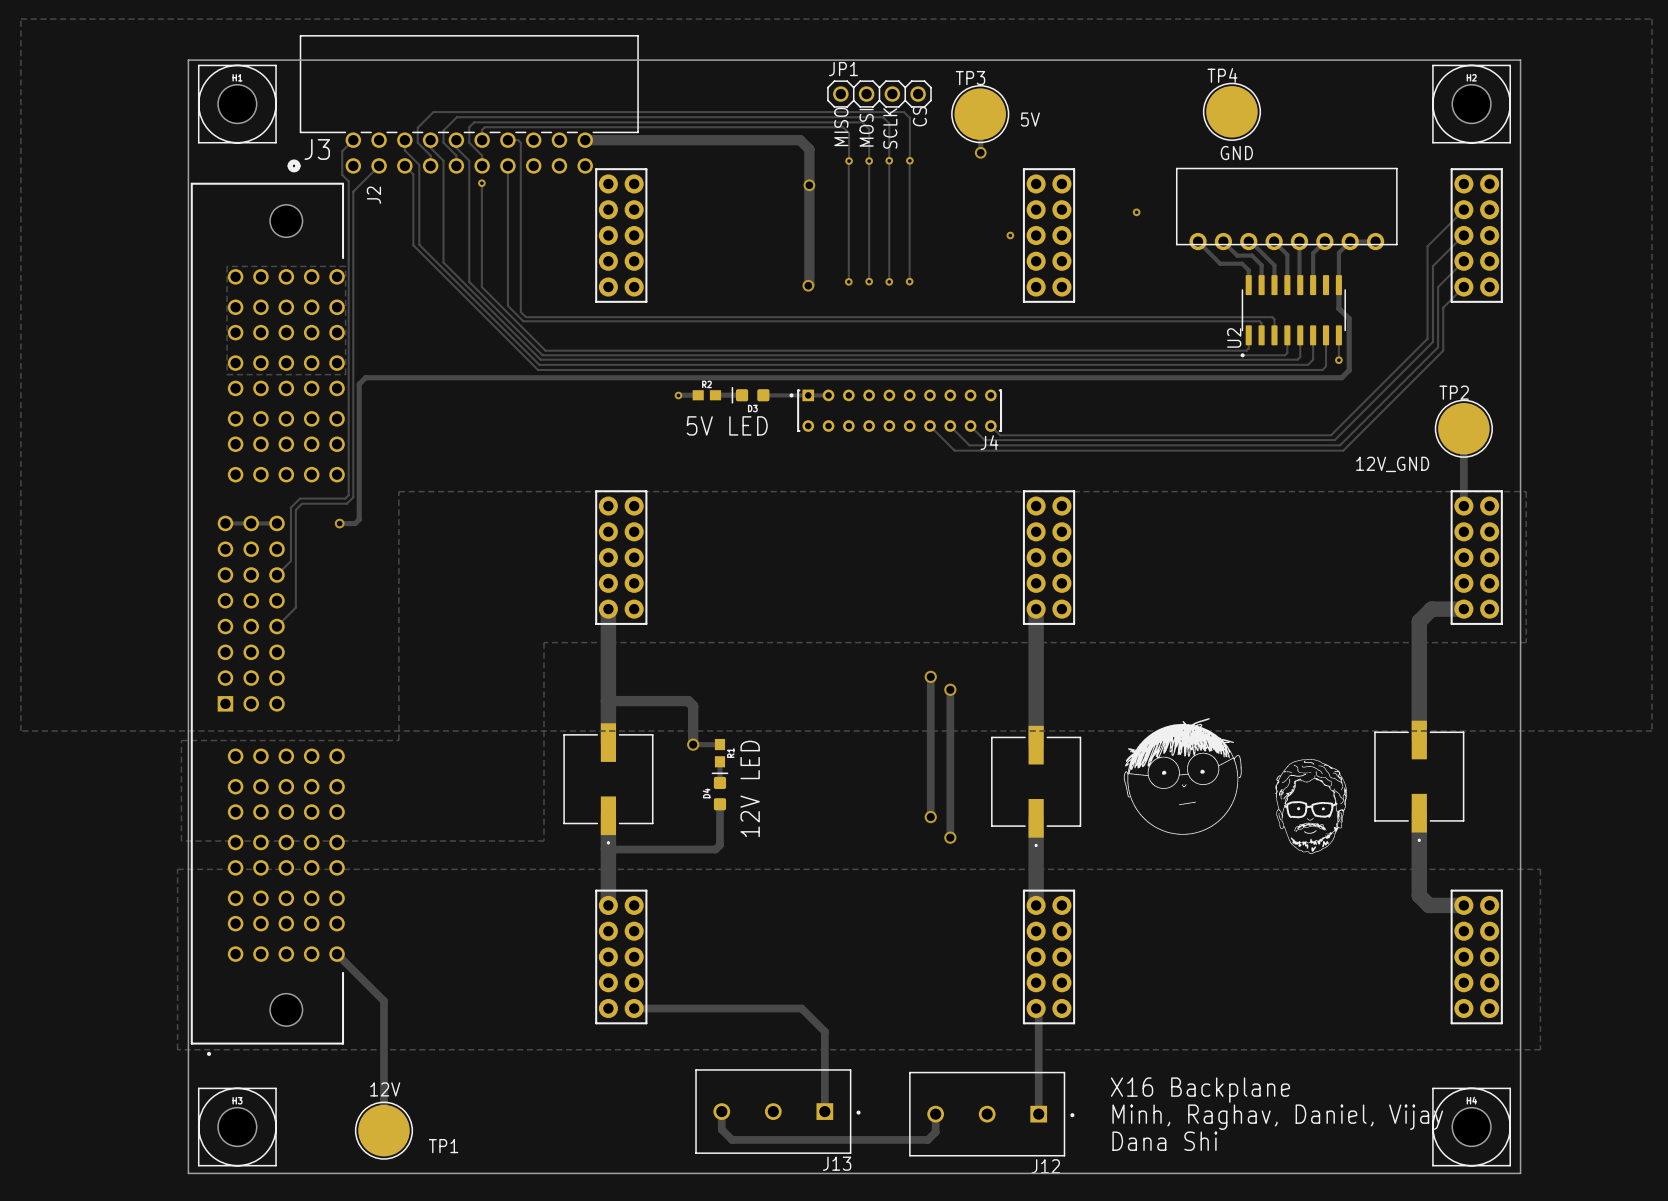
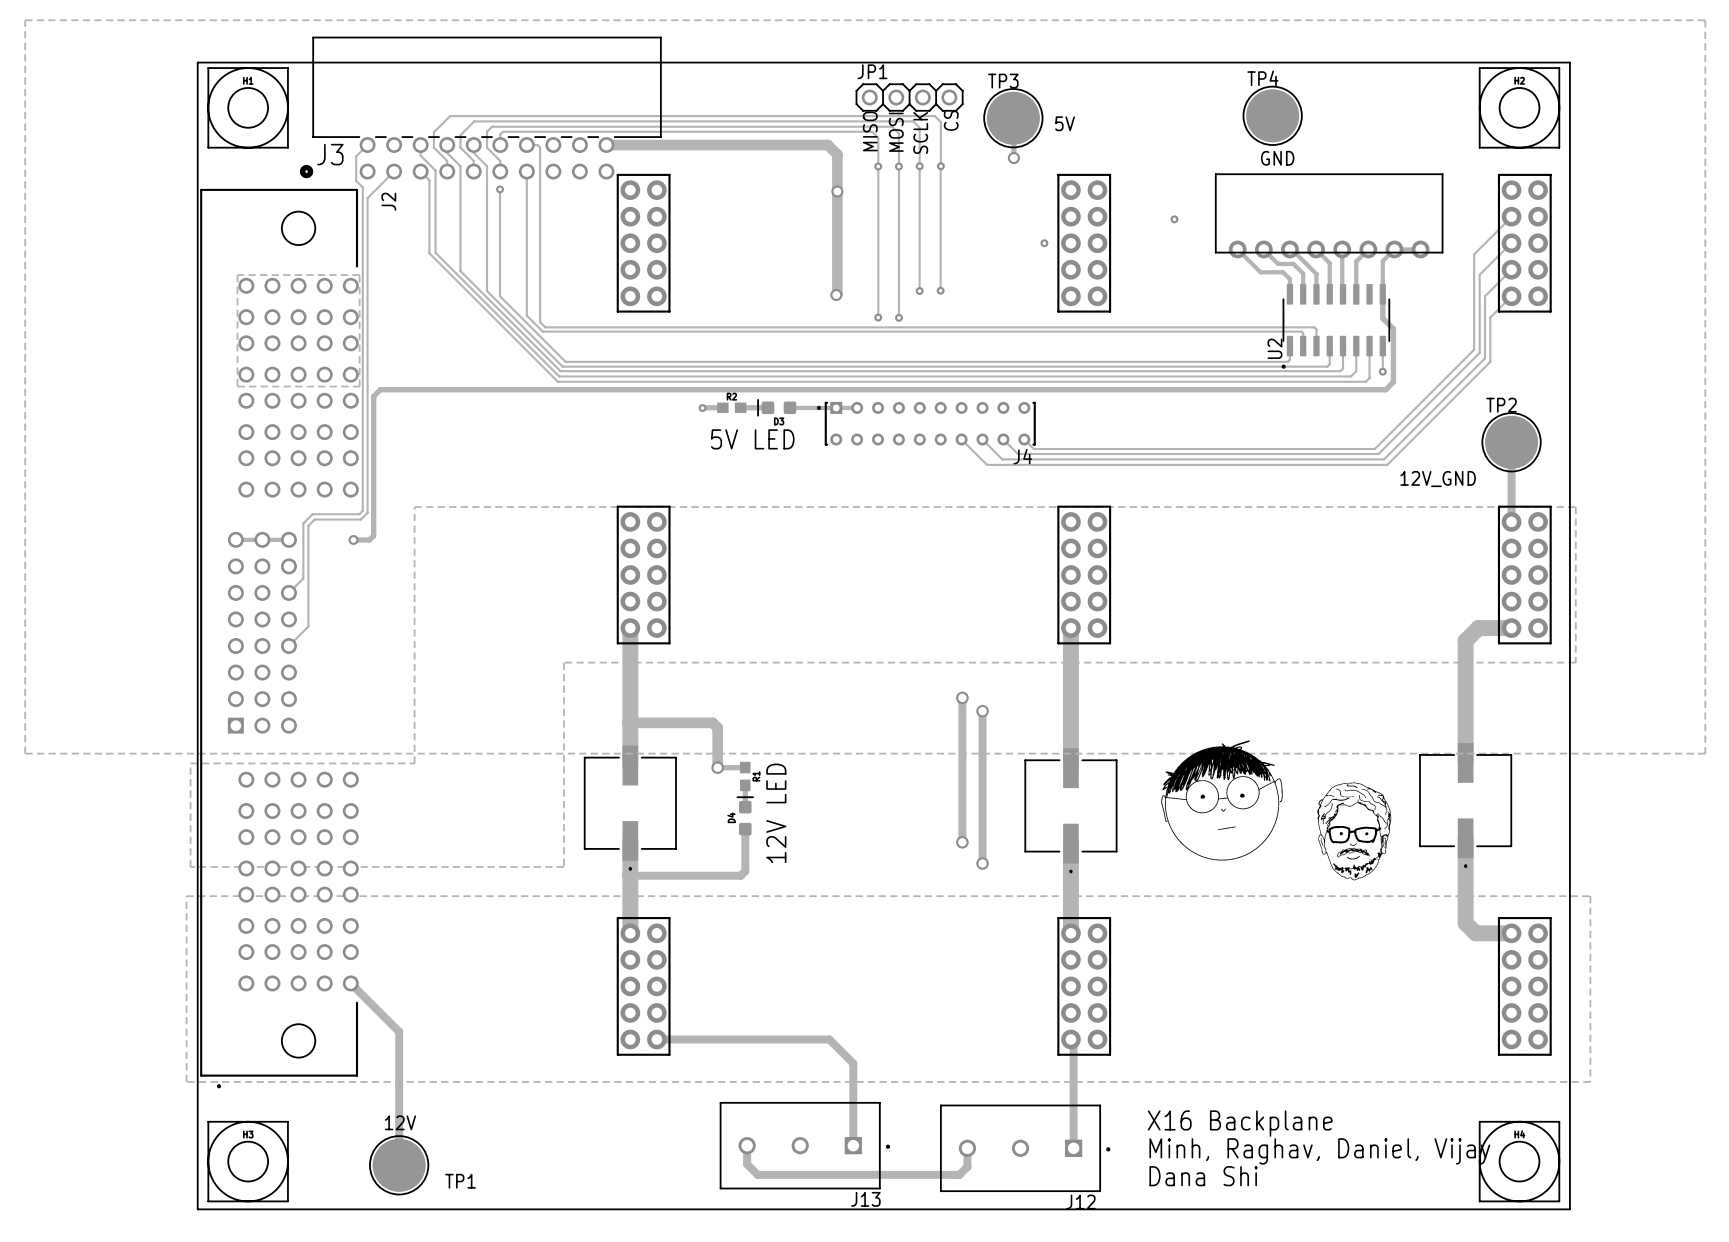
track: (849, 161) (848, 281) -> (878, 166) (878, 317)
via: (848, 281) -> none
track: none -> (898, 290) (898, 317)
via: (869, 281) -> none
via: none -> (878, 317)
via: none -> (898, 317)

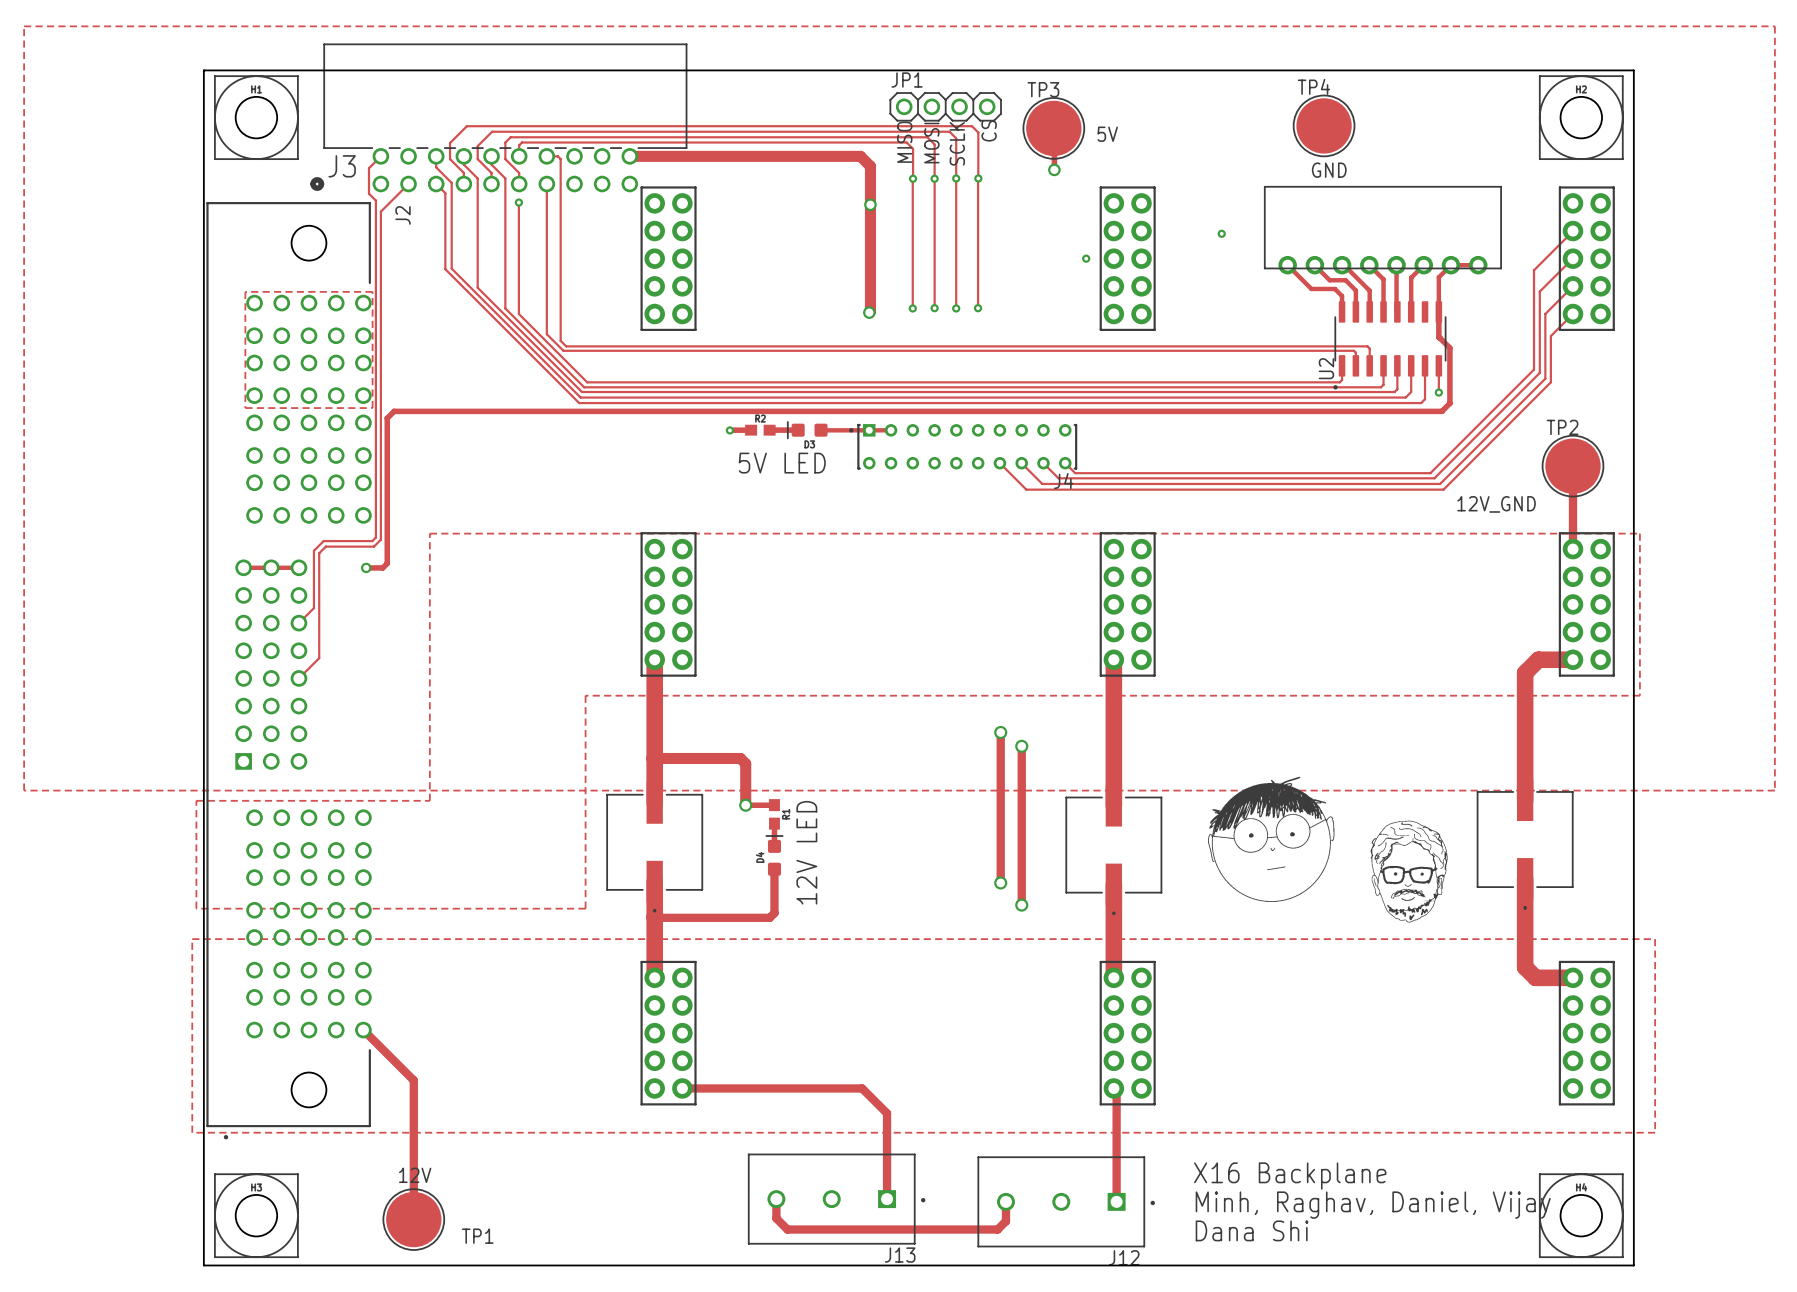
track: (878, 166) (878, 317) -> (913, 178) (912, 308)
track: (898, 290) (898, 317) -> none
via: none -> (934, 308)
via: none -> (912, 308)
via: (878, 317) -> none
via: (898, 317) -> none

